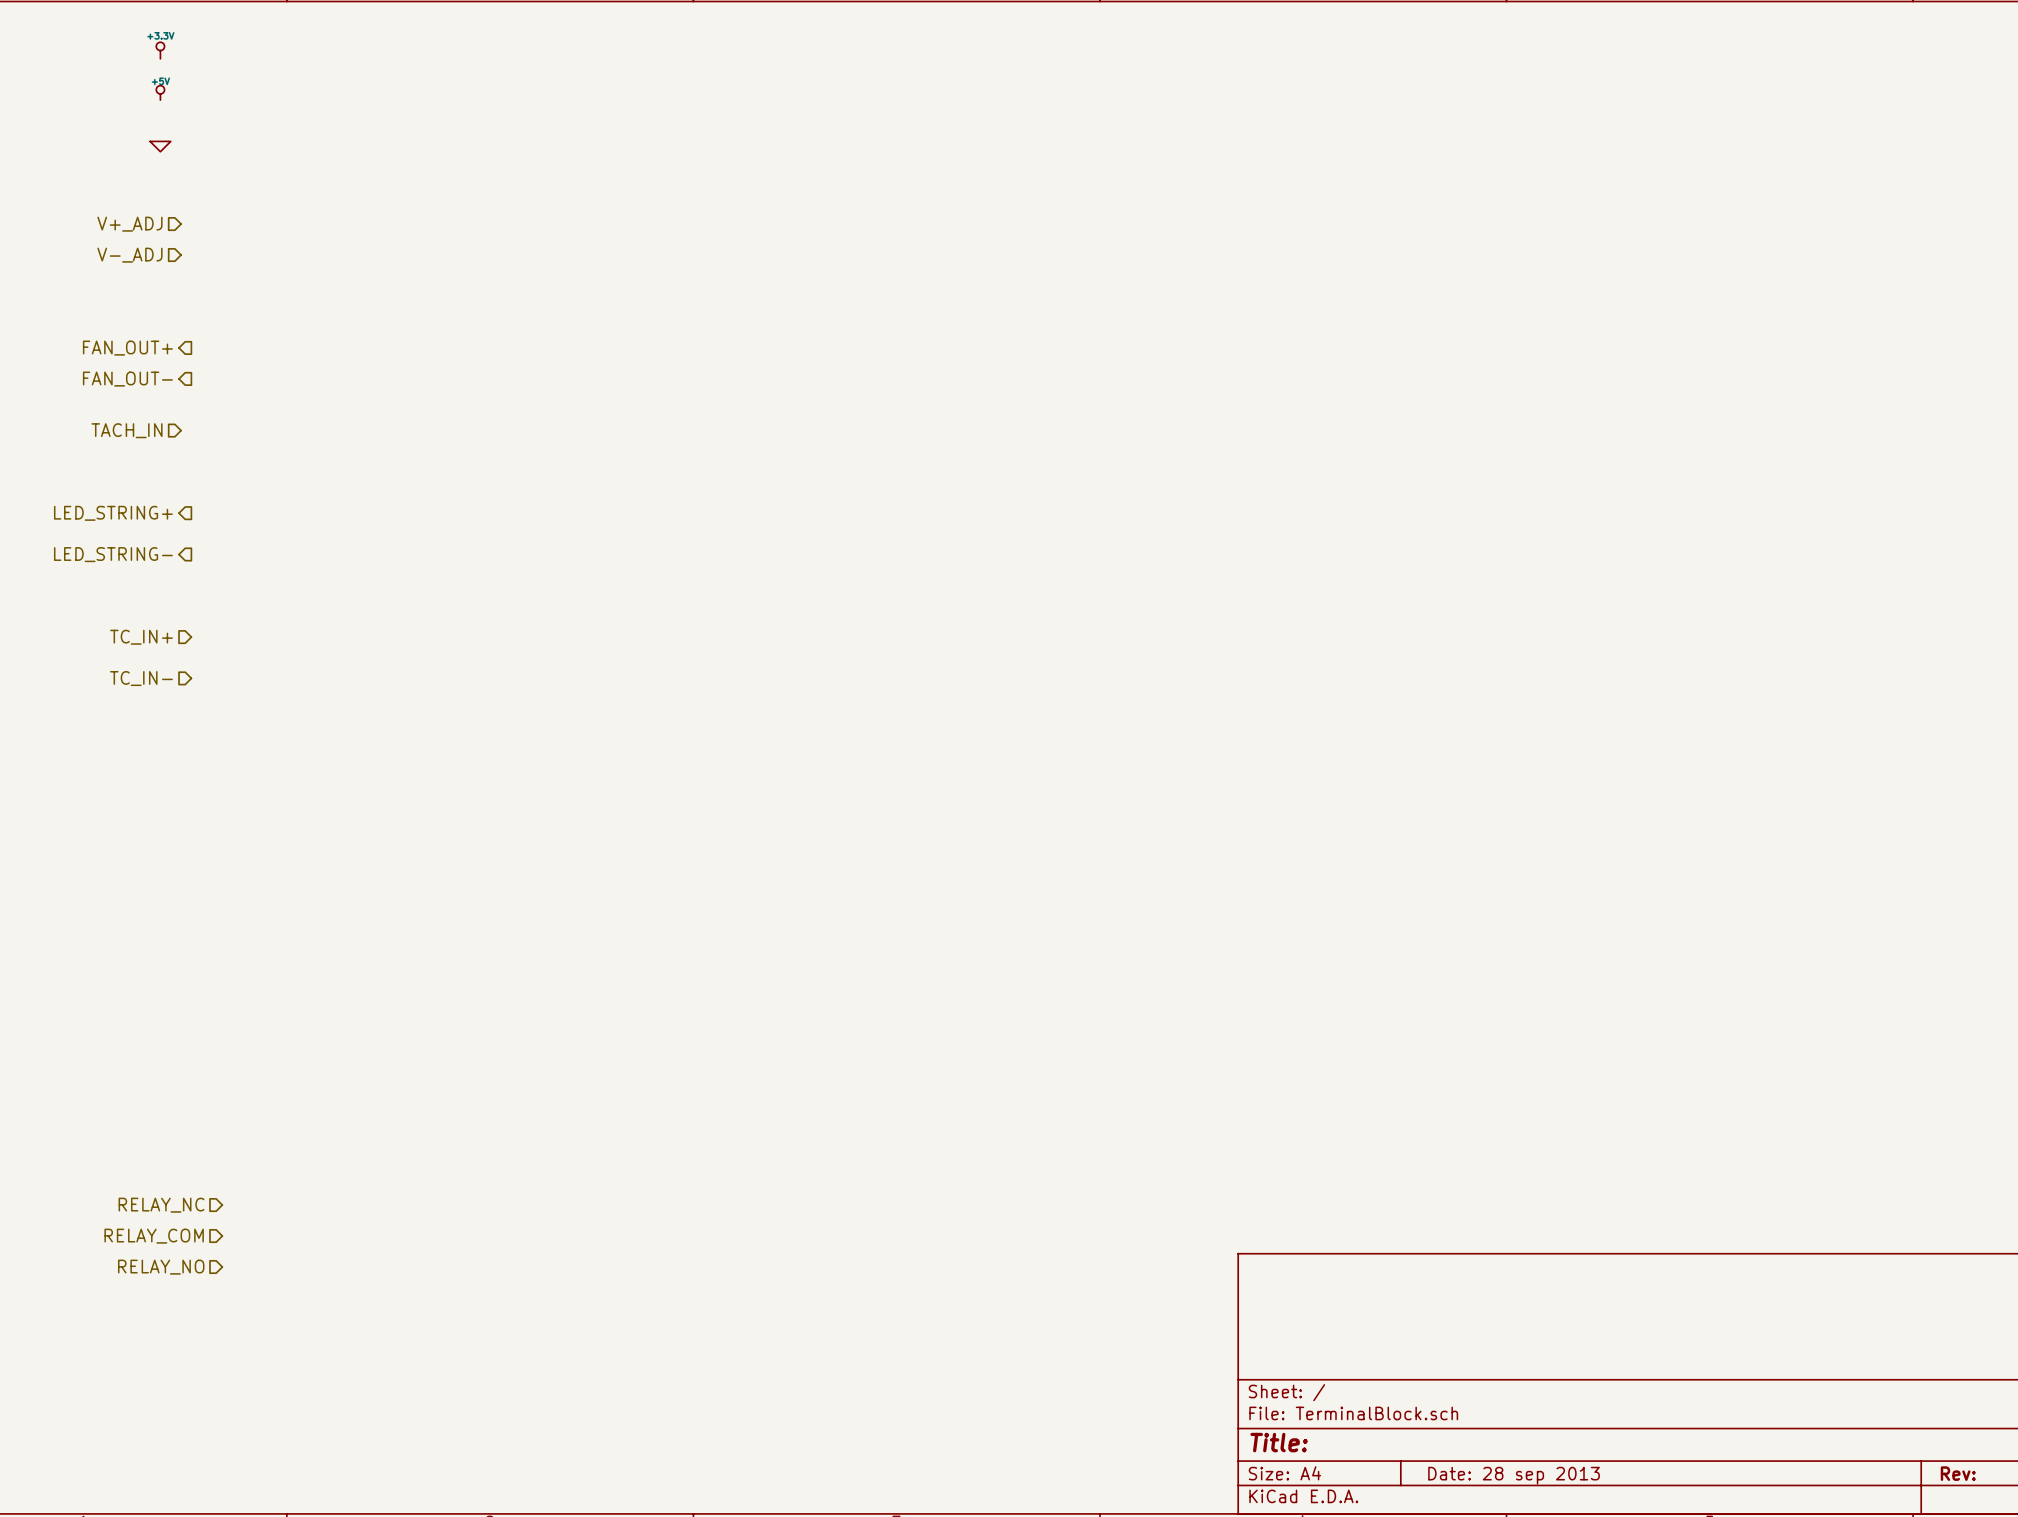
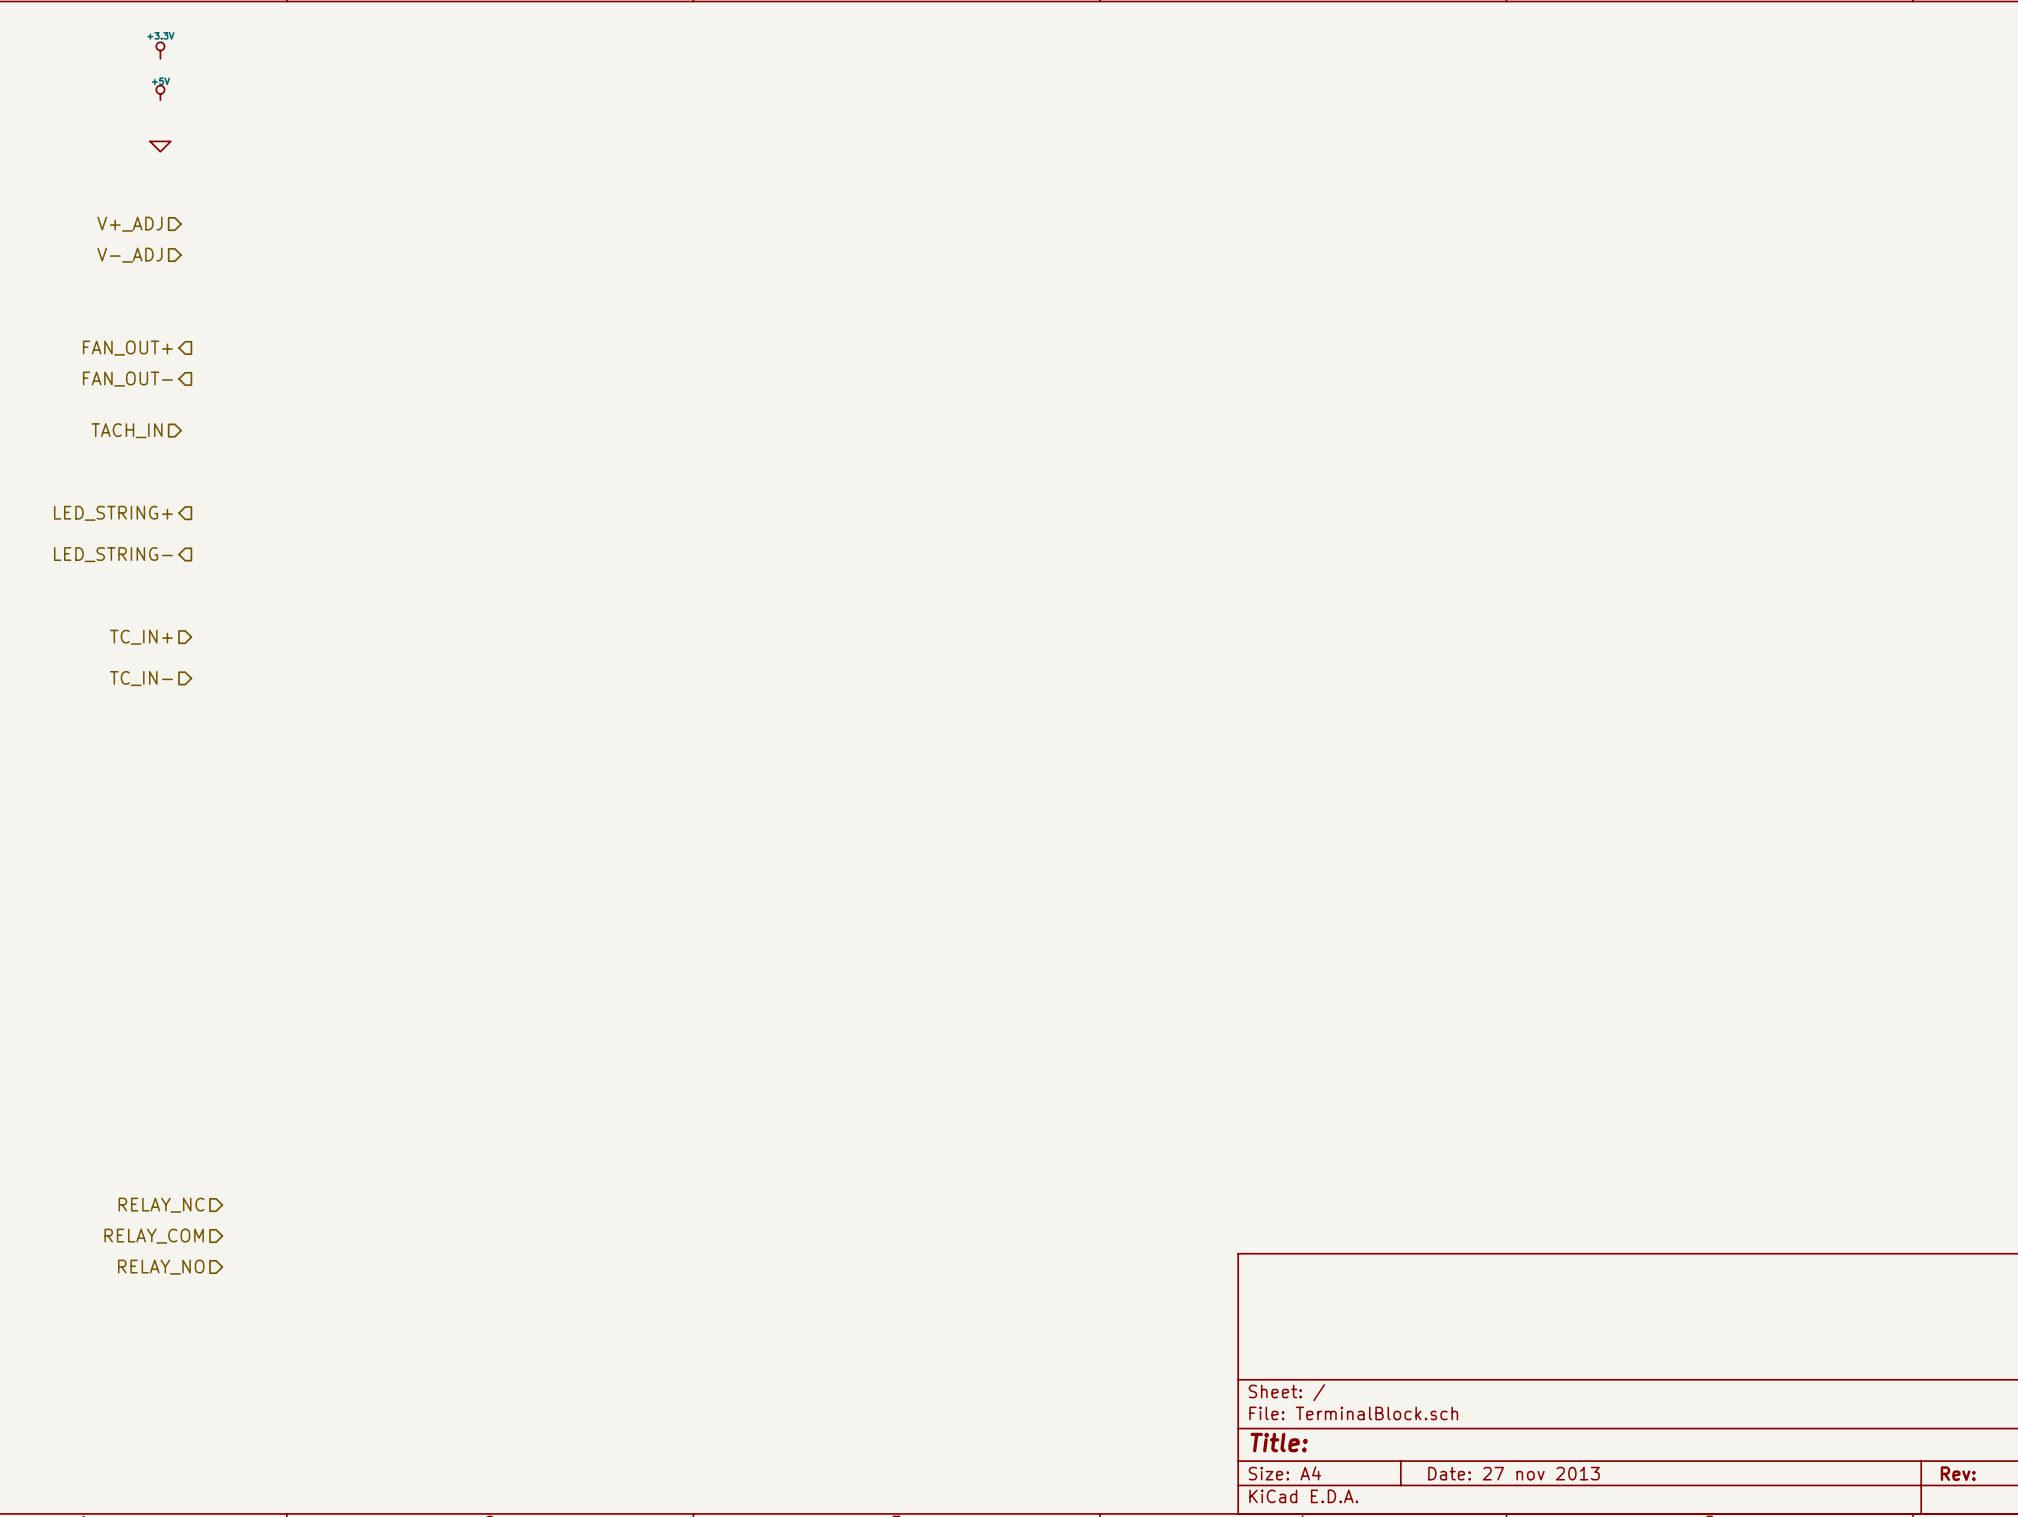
title block: Date: 28 sep 2013 (1514, 1475) -> Date: 27 nov 2013 (1514, 1473)

